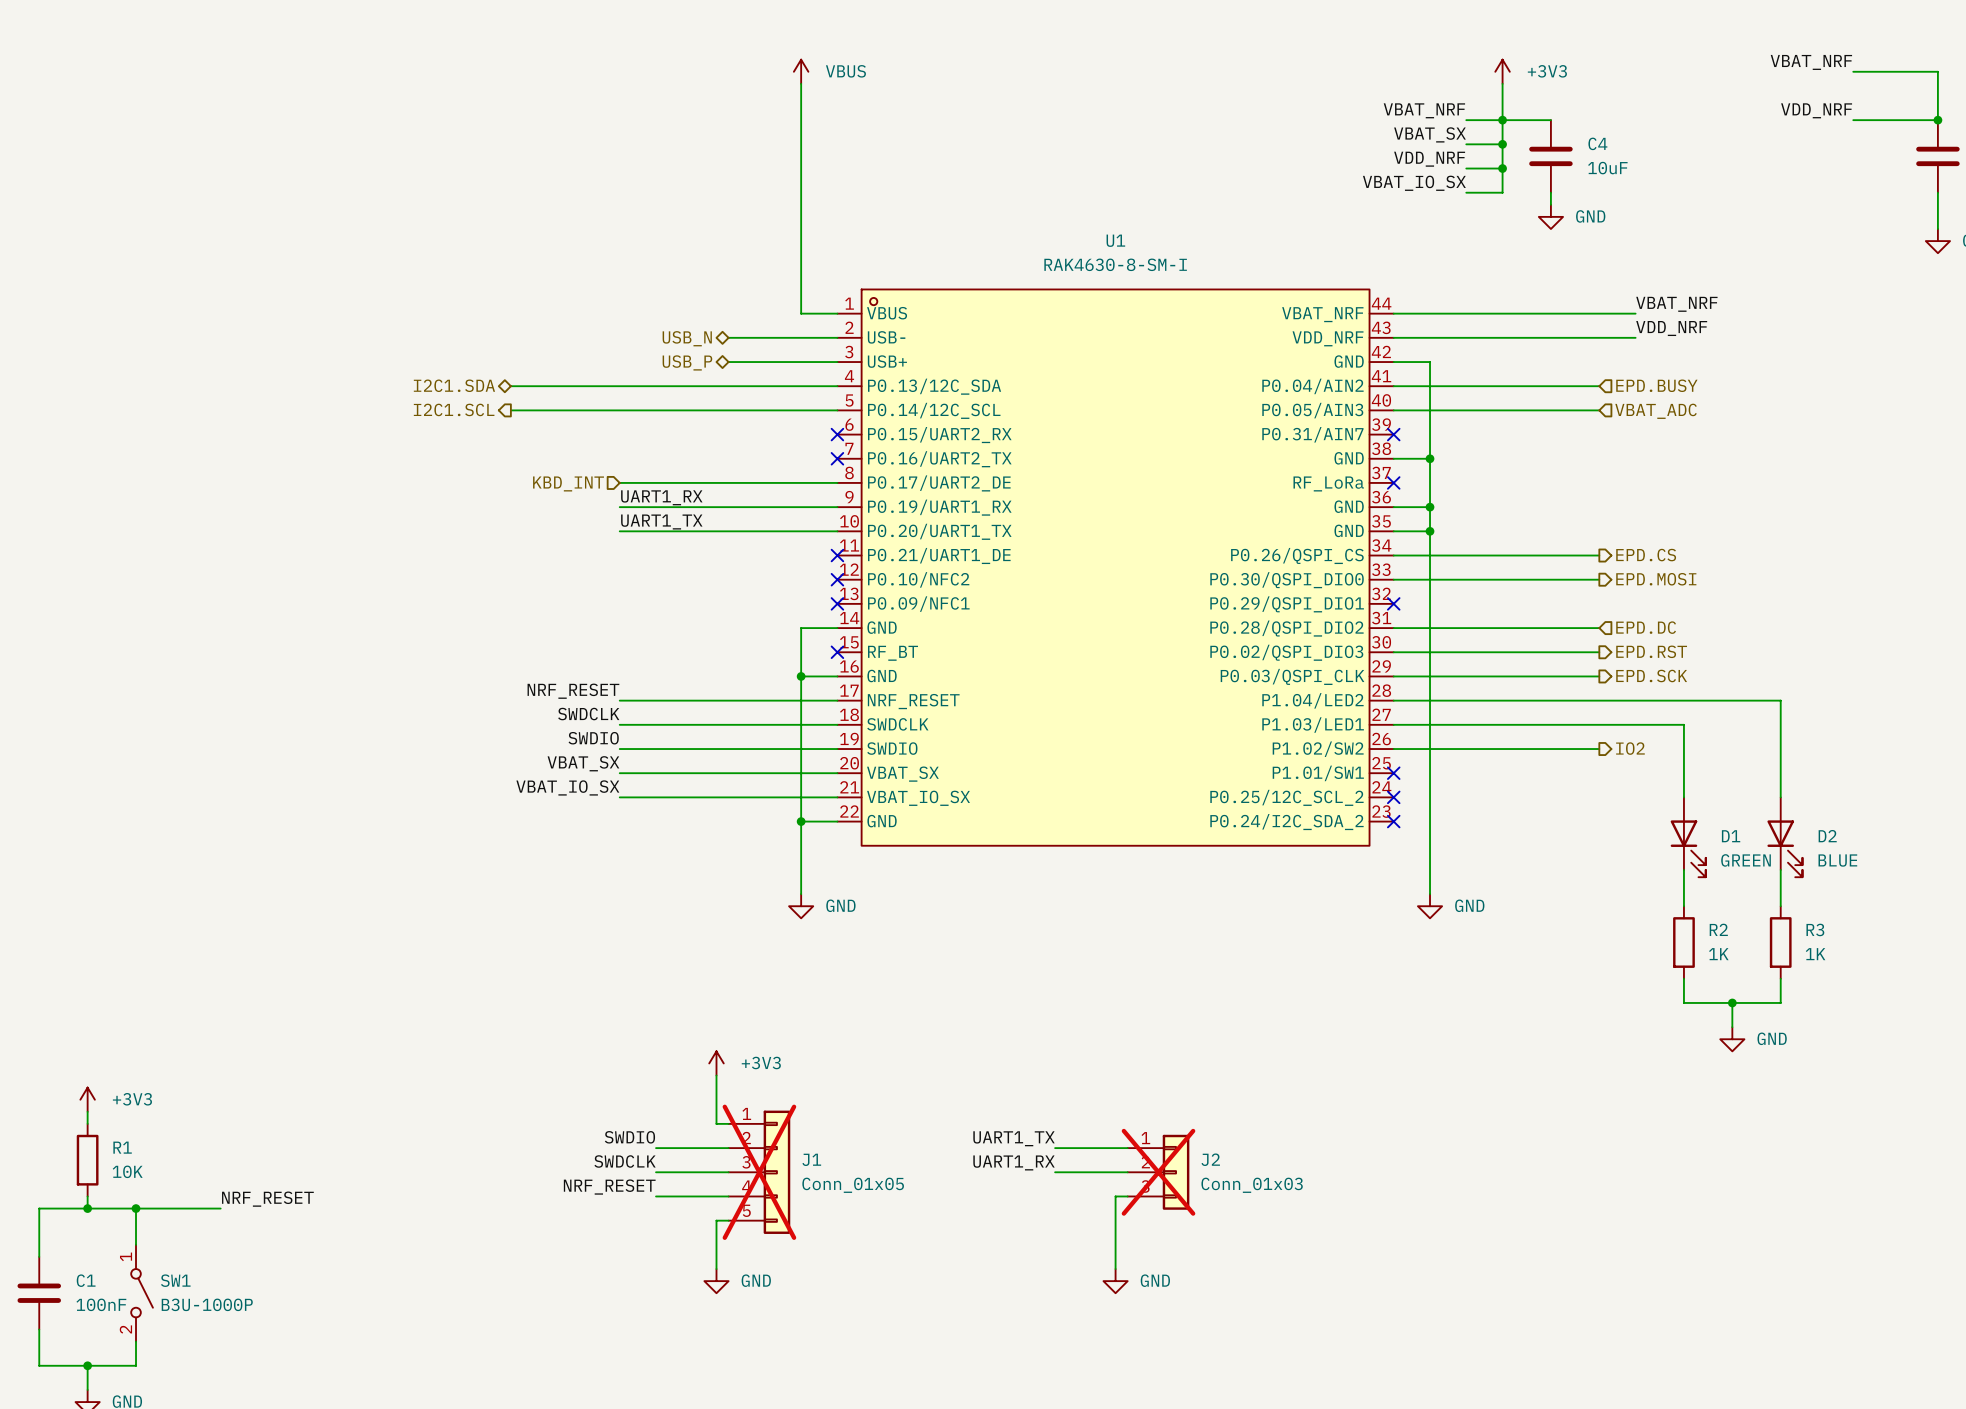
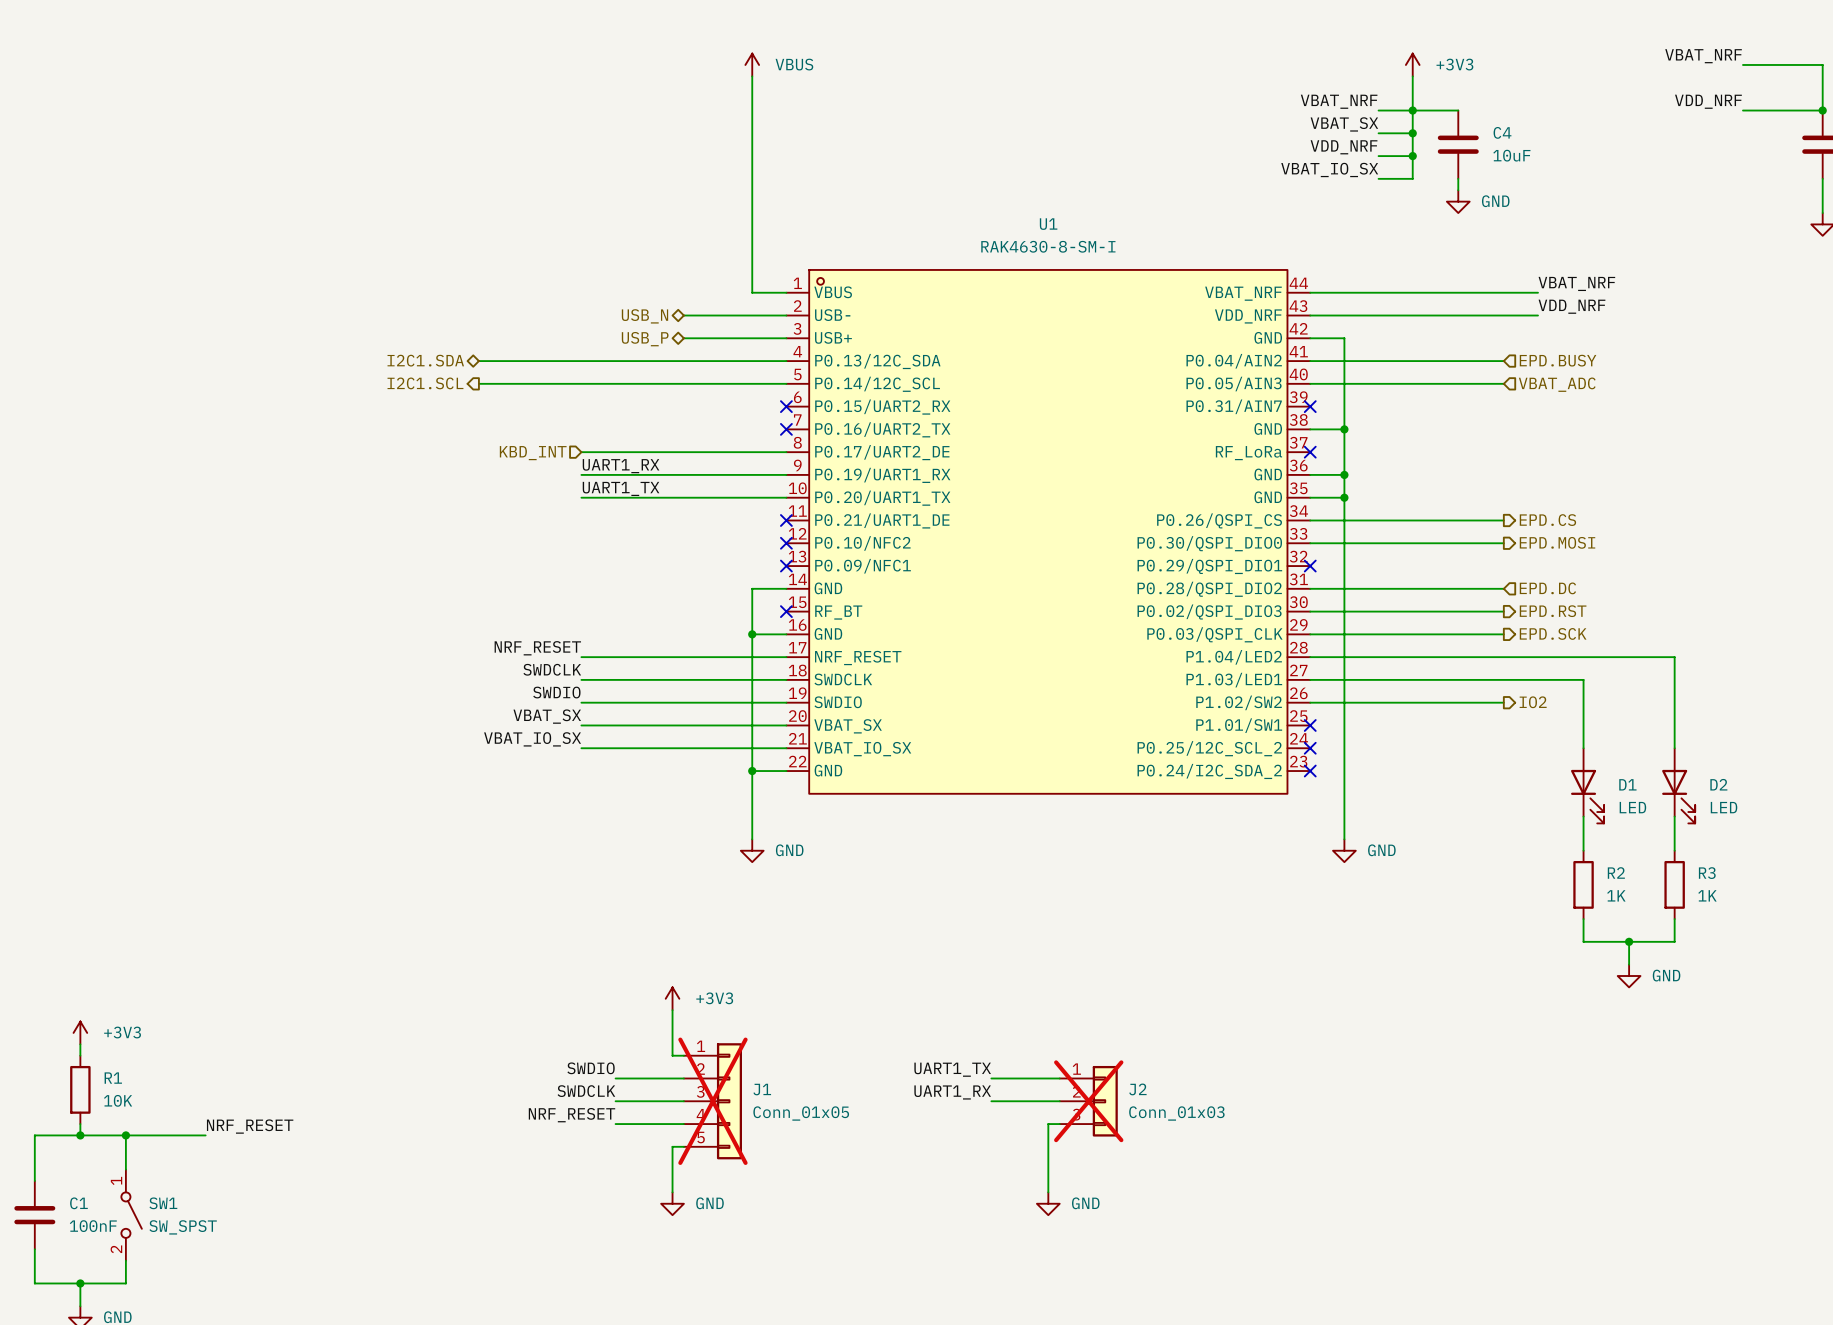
D1 value: GREEN (1746, 860) -> LED (1632, 807)
D2 value: BLUE (1837, 860) -> LED (1724, 807)
SW1 value: B3U-1000P (207, 1304) -> SW_SPST (183, 1227)

